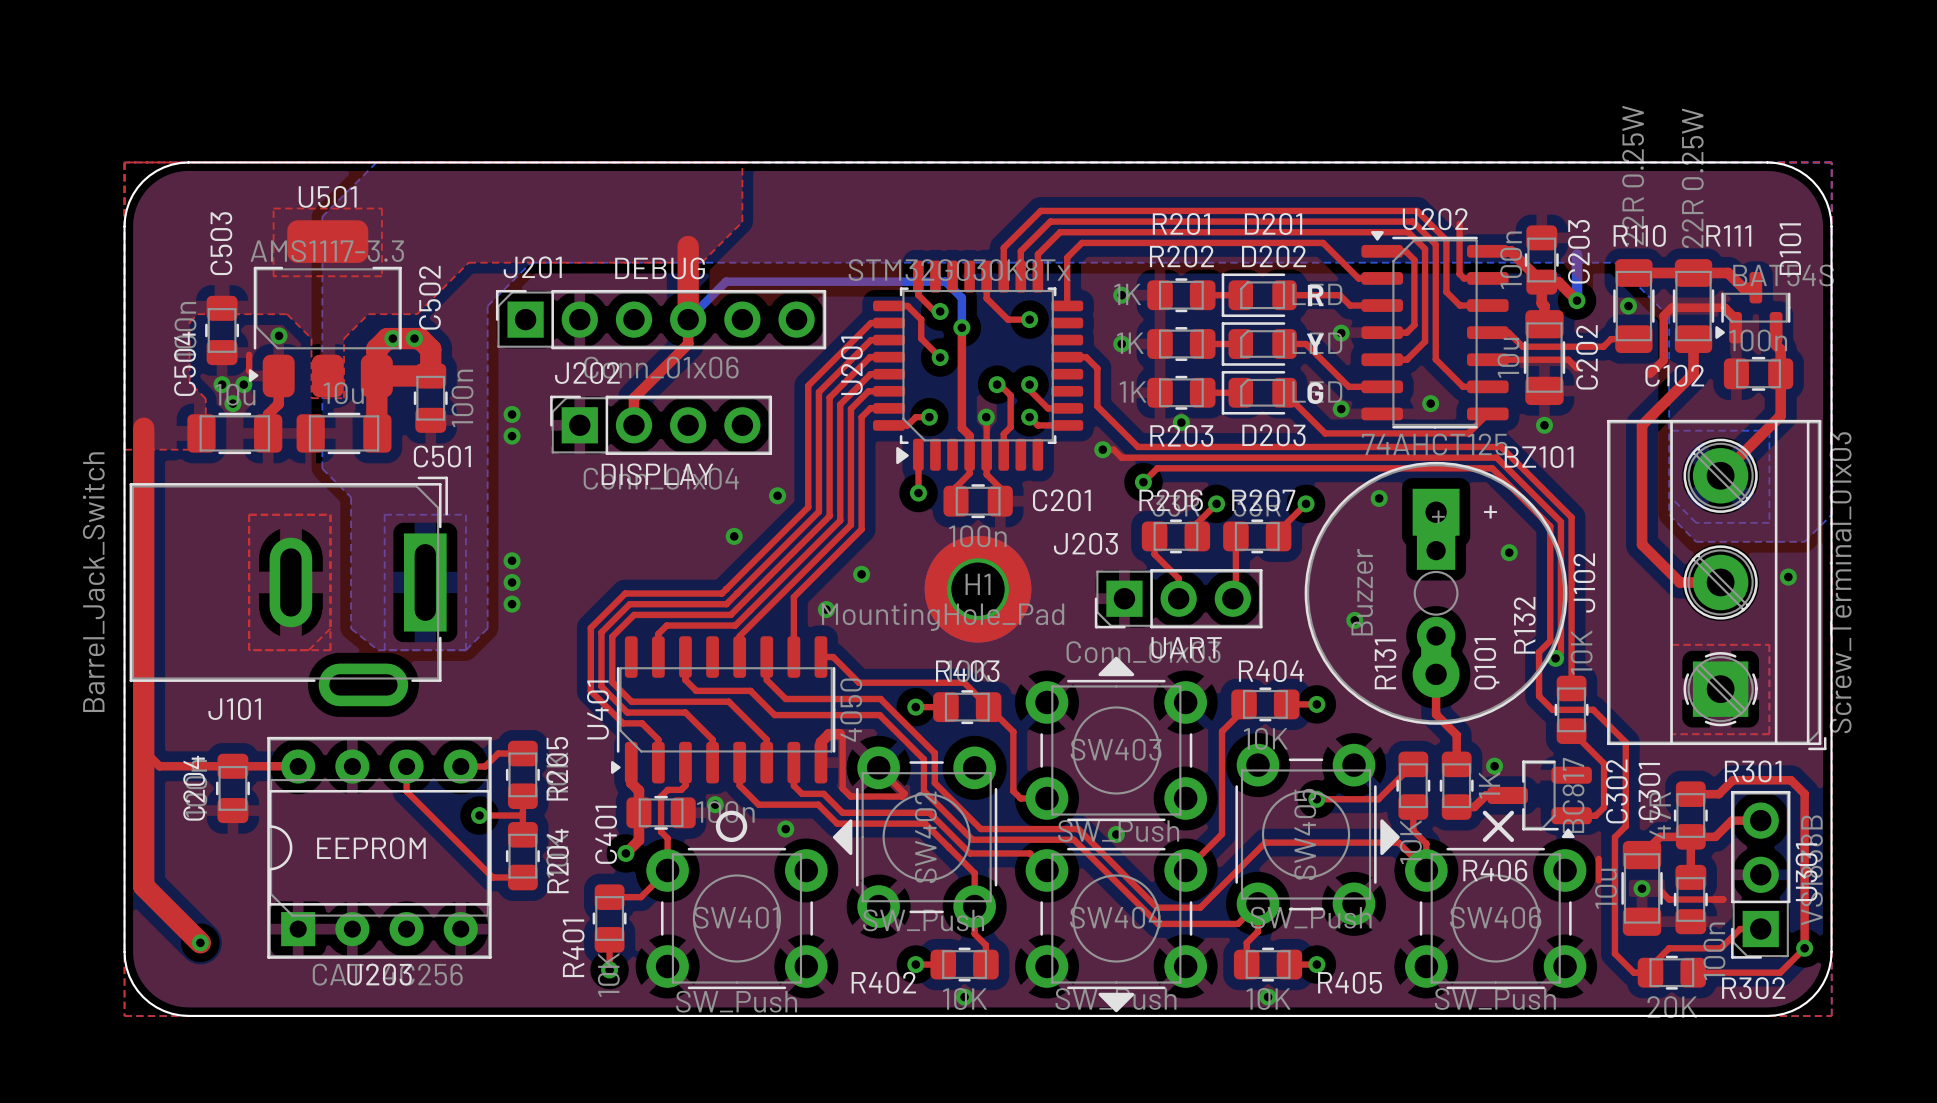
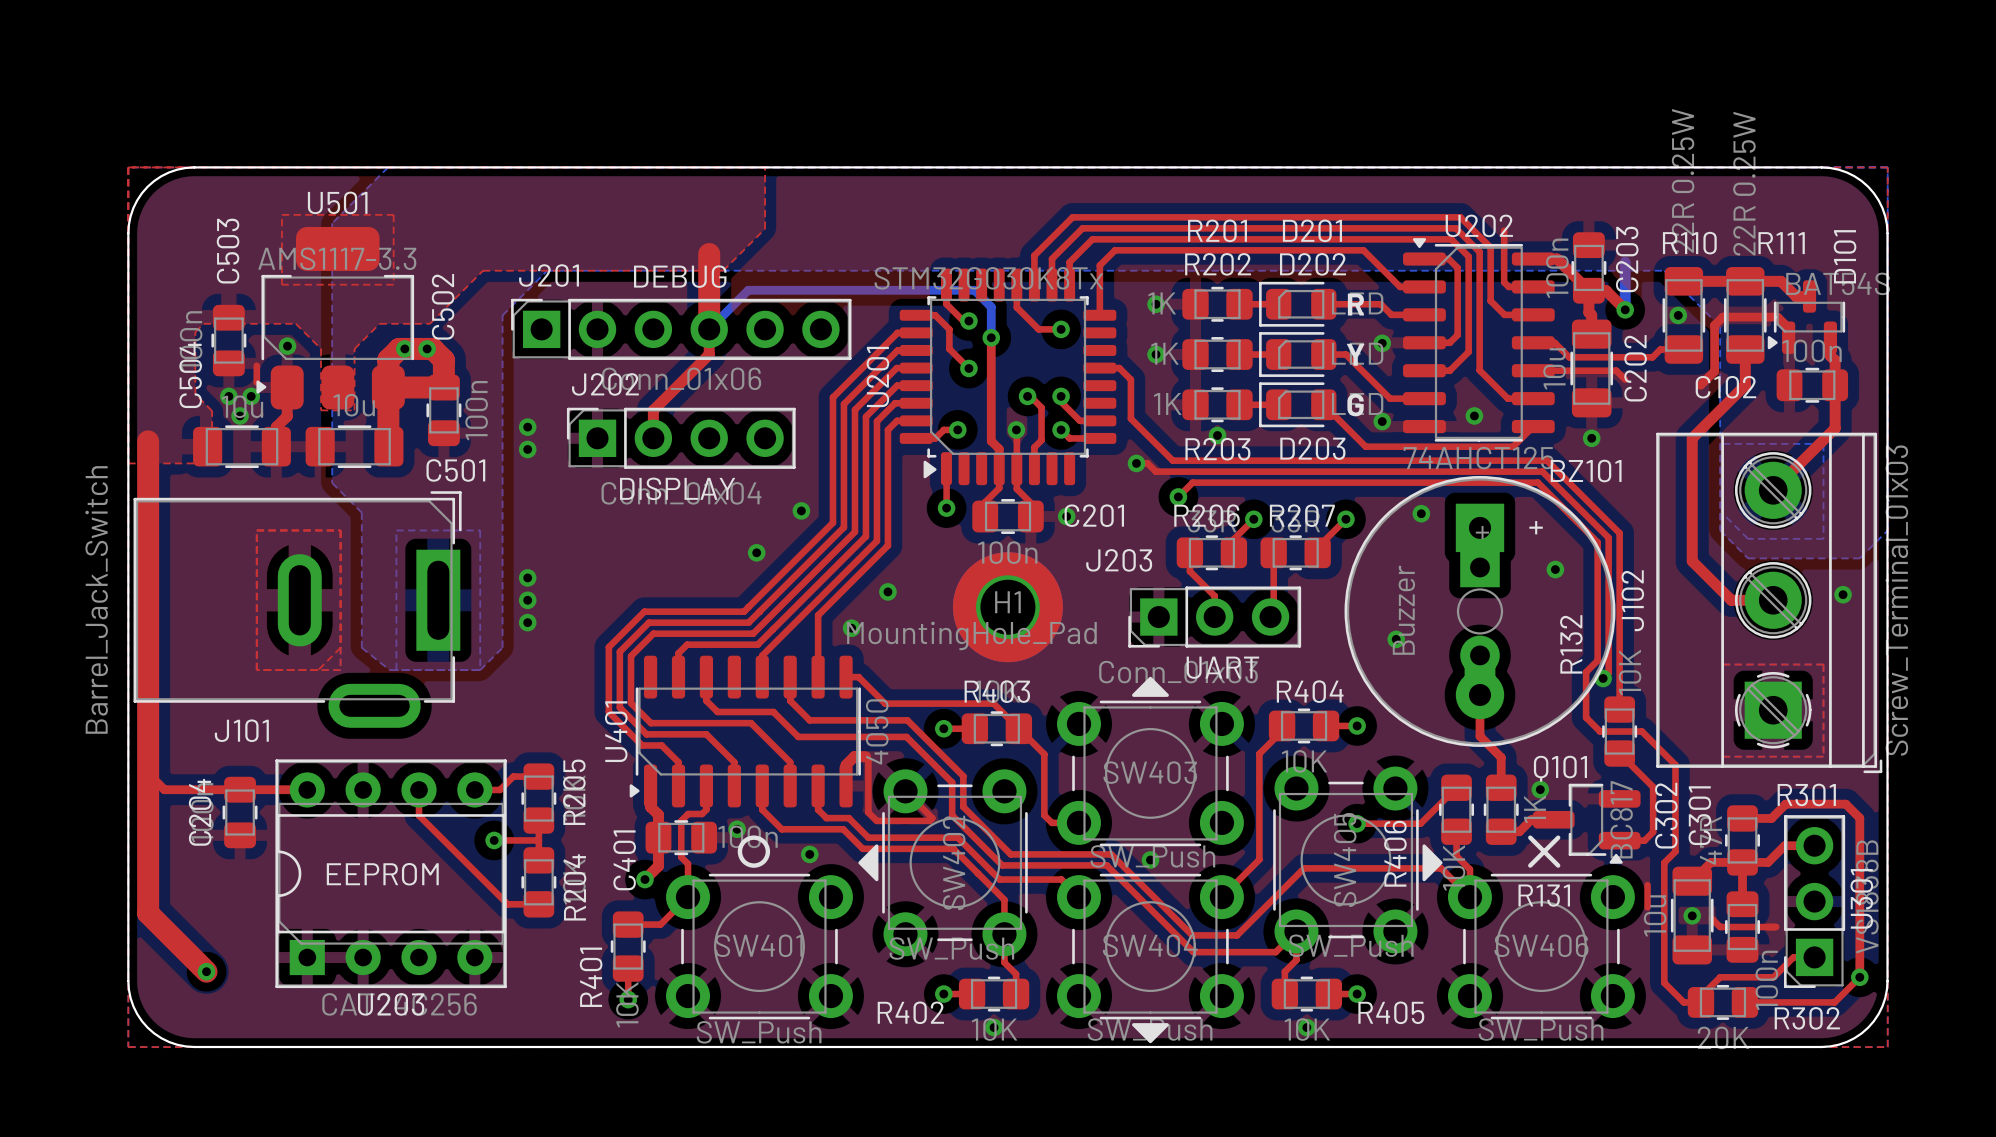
via: none -> (1066, 516)
Q101 name rotation: 0° (1486, 663) -> 90° clockwise (1560, 768)
R131 name rotation: 0° (1385, 664) -> 90° clockwise (1544, 895)
R131 name position: R131 (1385, 664) -> R131 (1544, 895)
R406 name rotation: 0° (1495, 870) -> 90° counterclockwise (1395, 853)
R406 name position: R406 (1495, 870) -> R406 (1395, 853)

